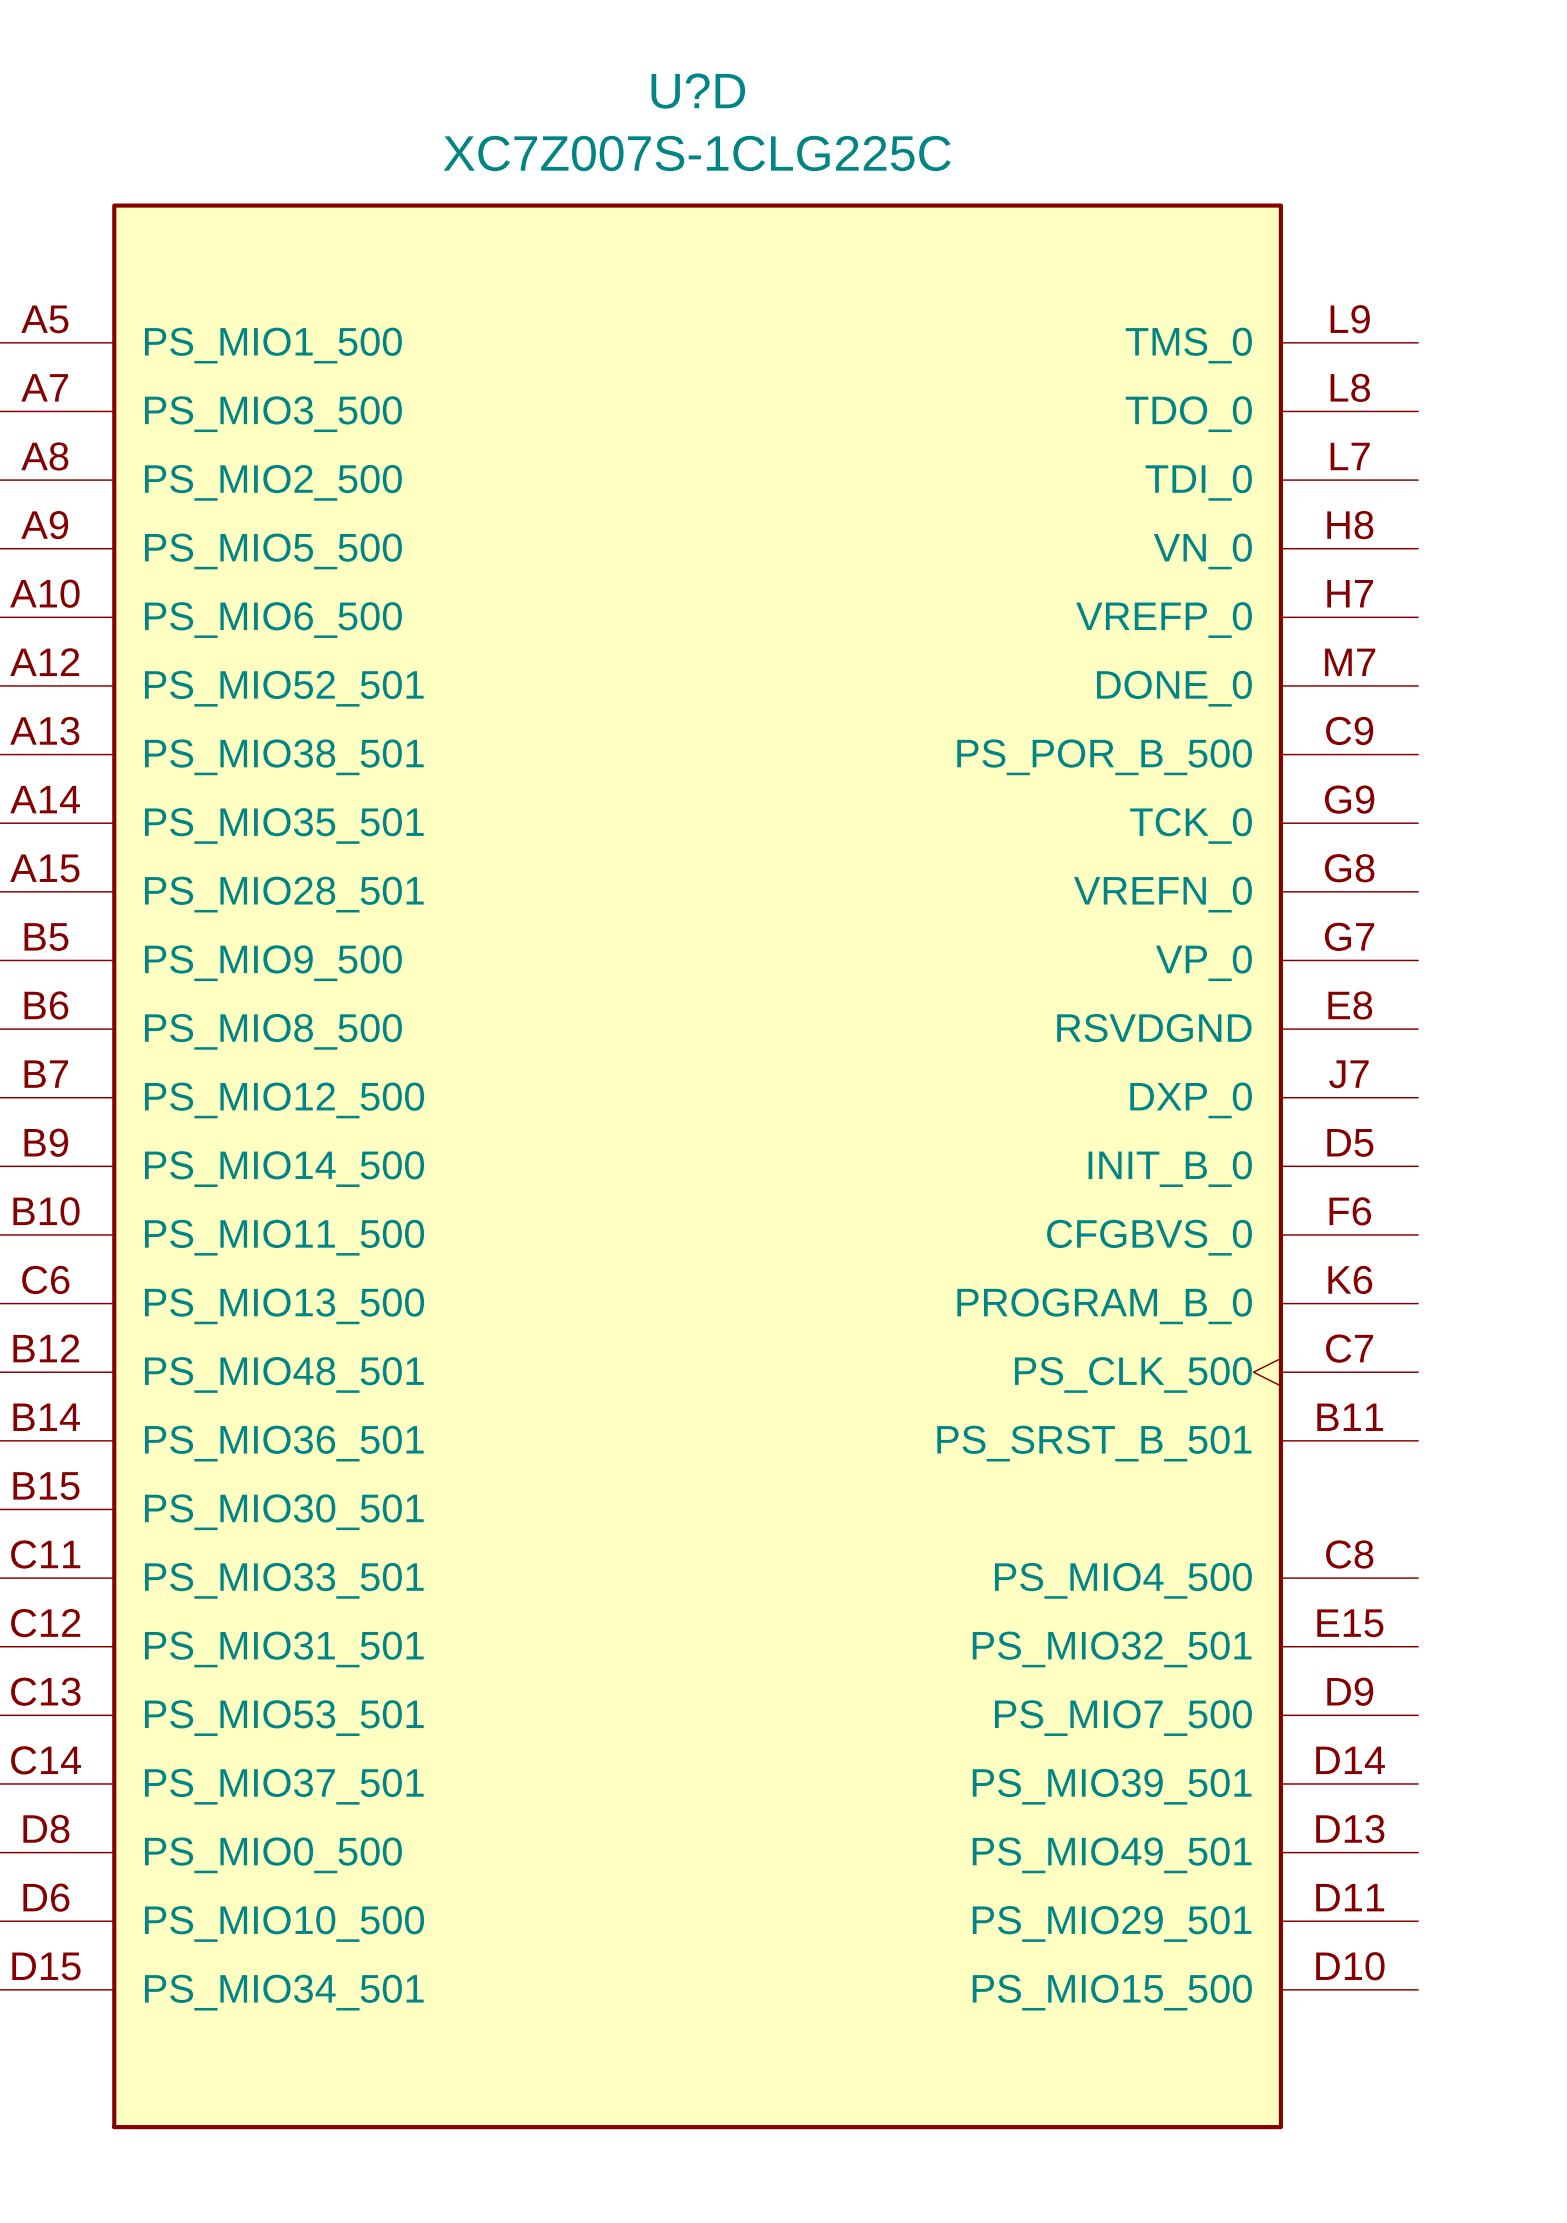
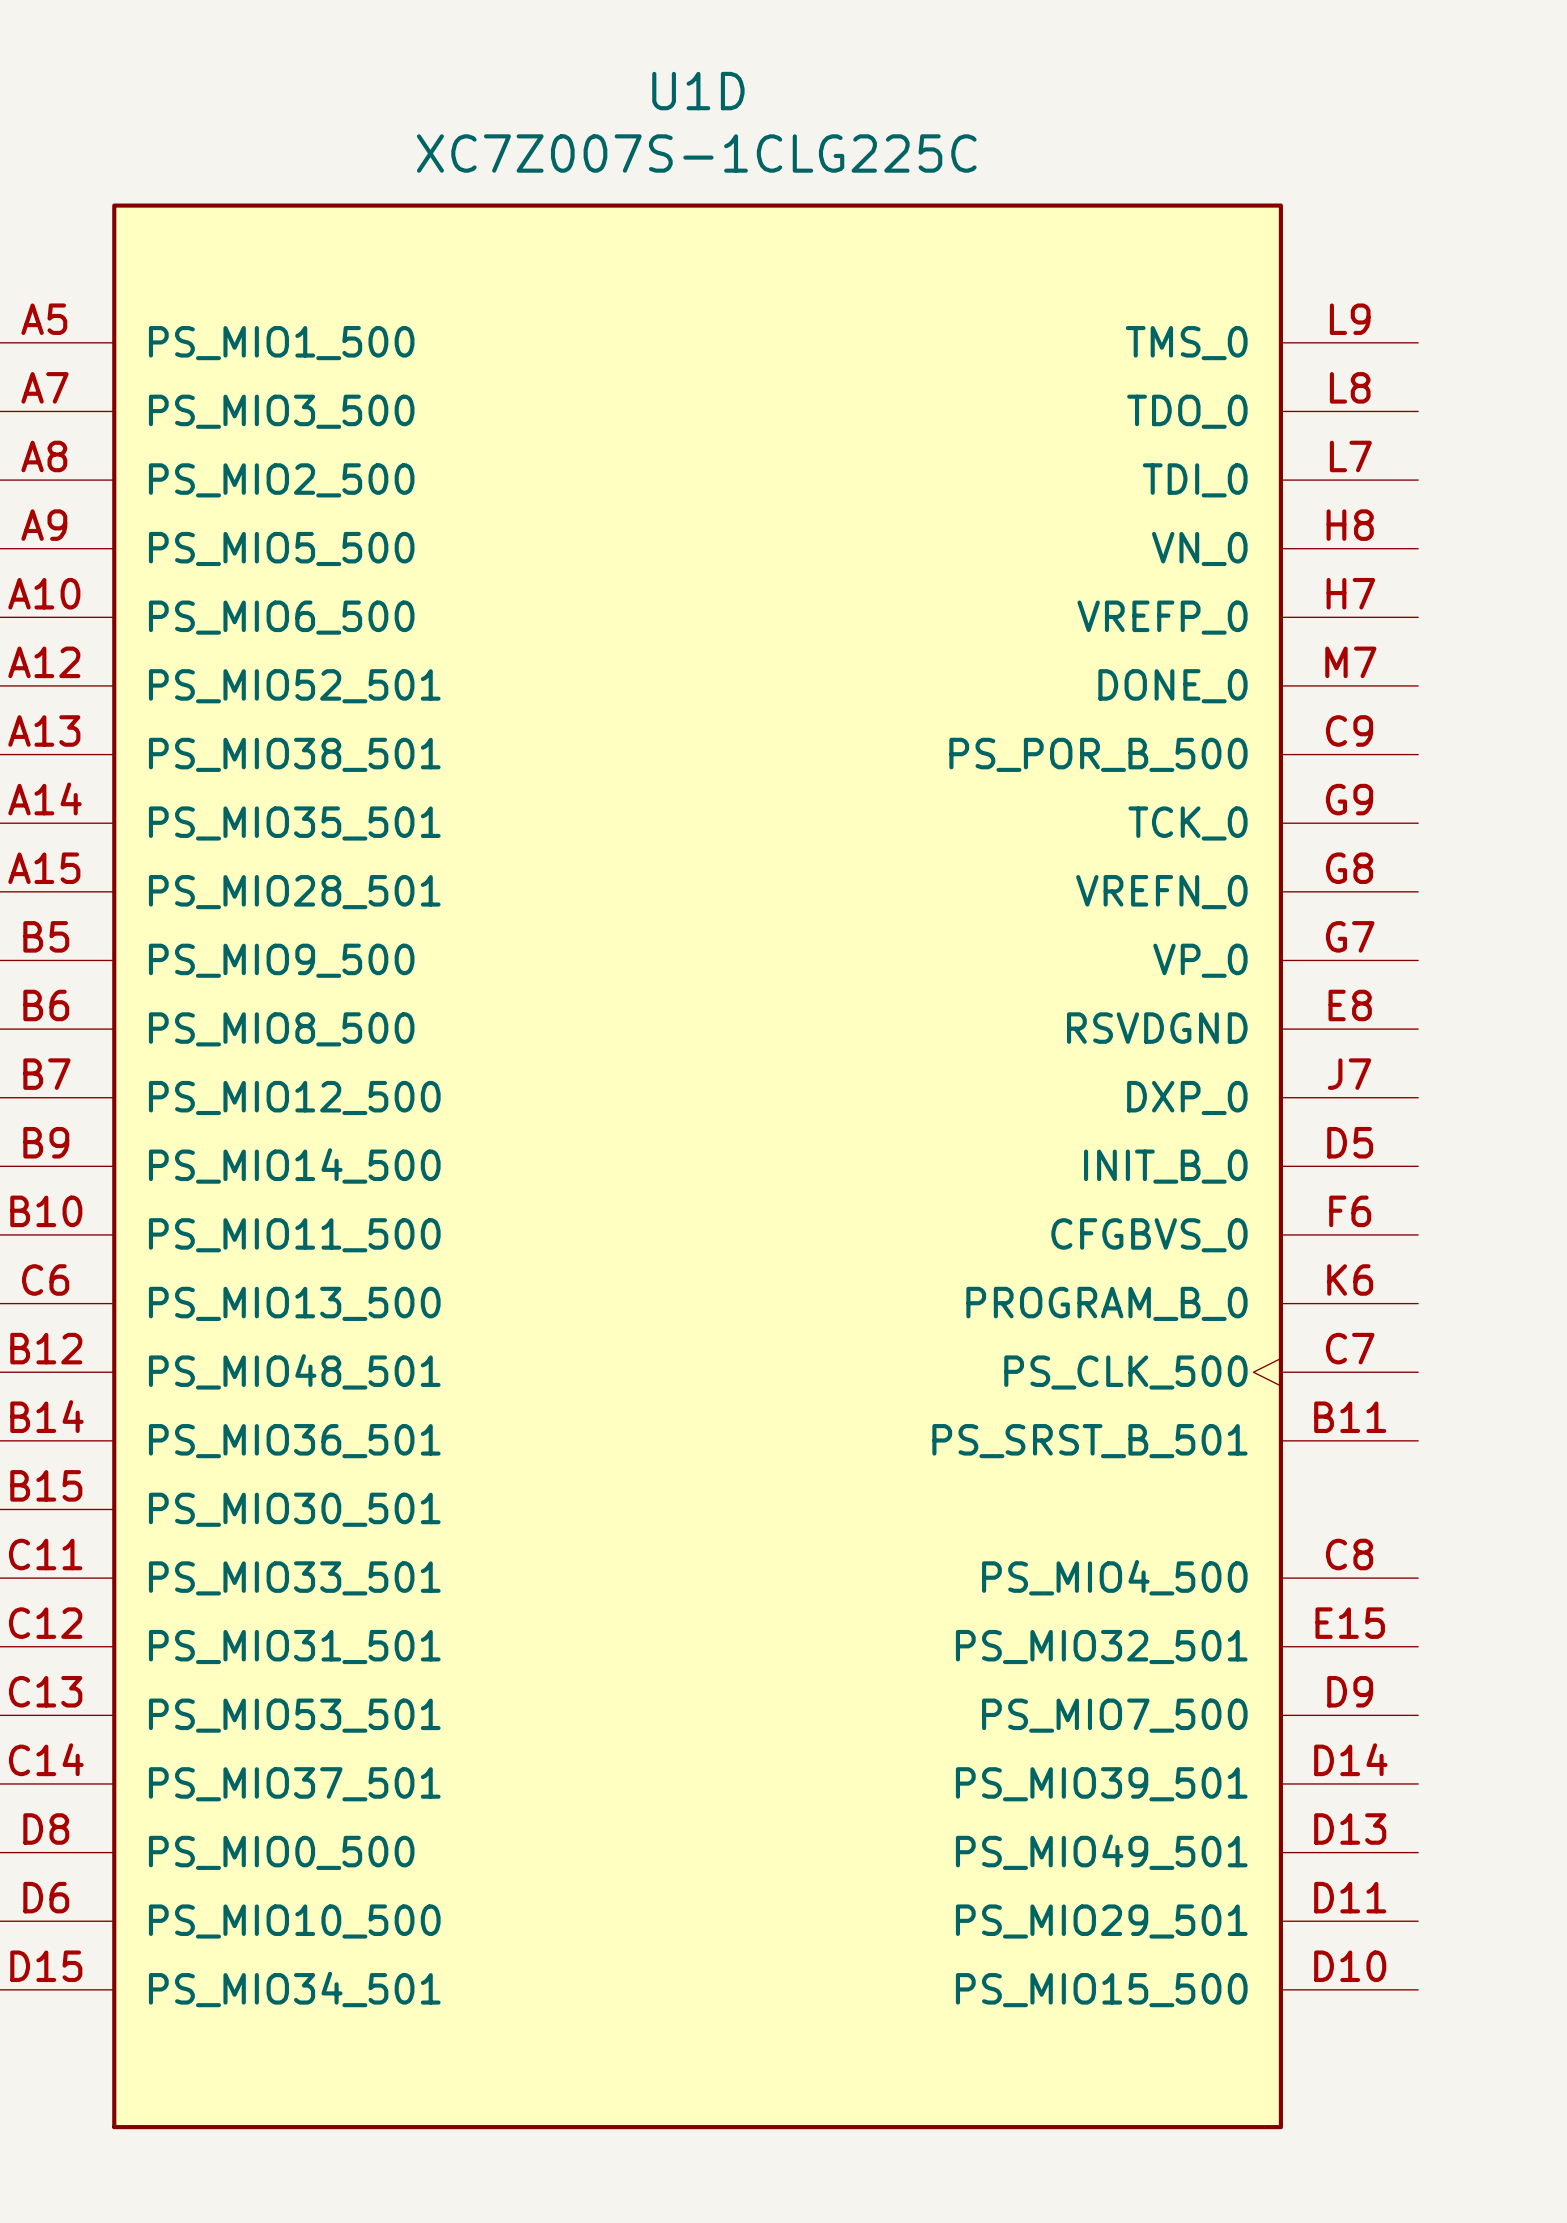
U?D name: U?D (698, 91) -> U1D (698, 91)

